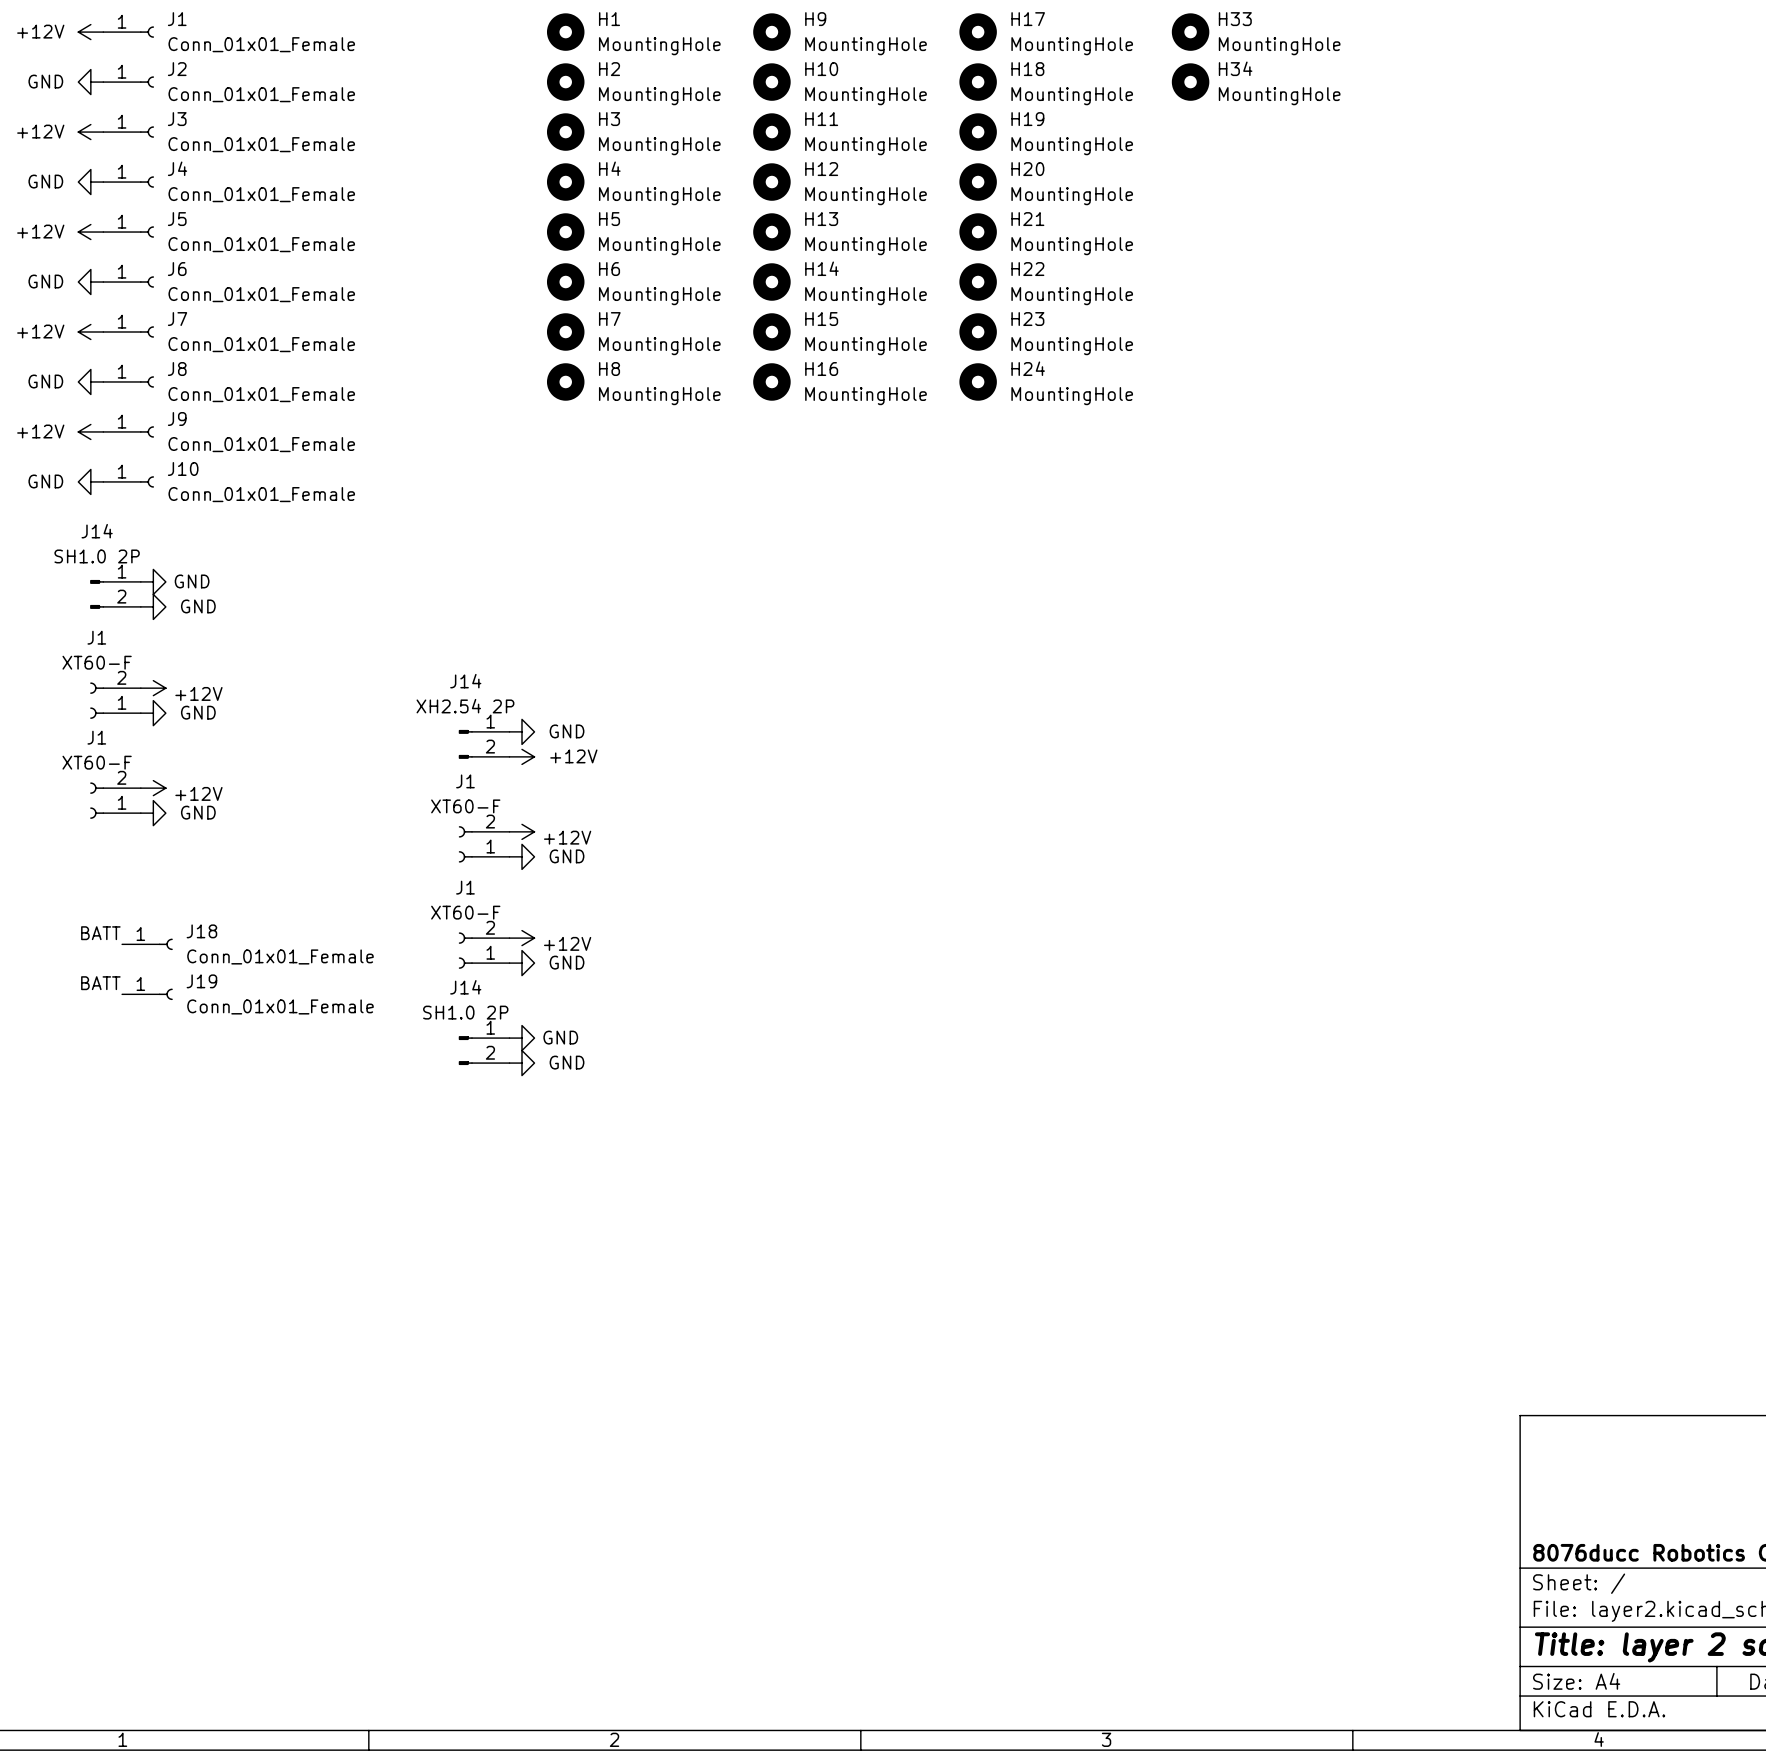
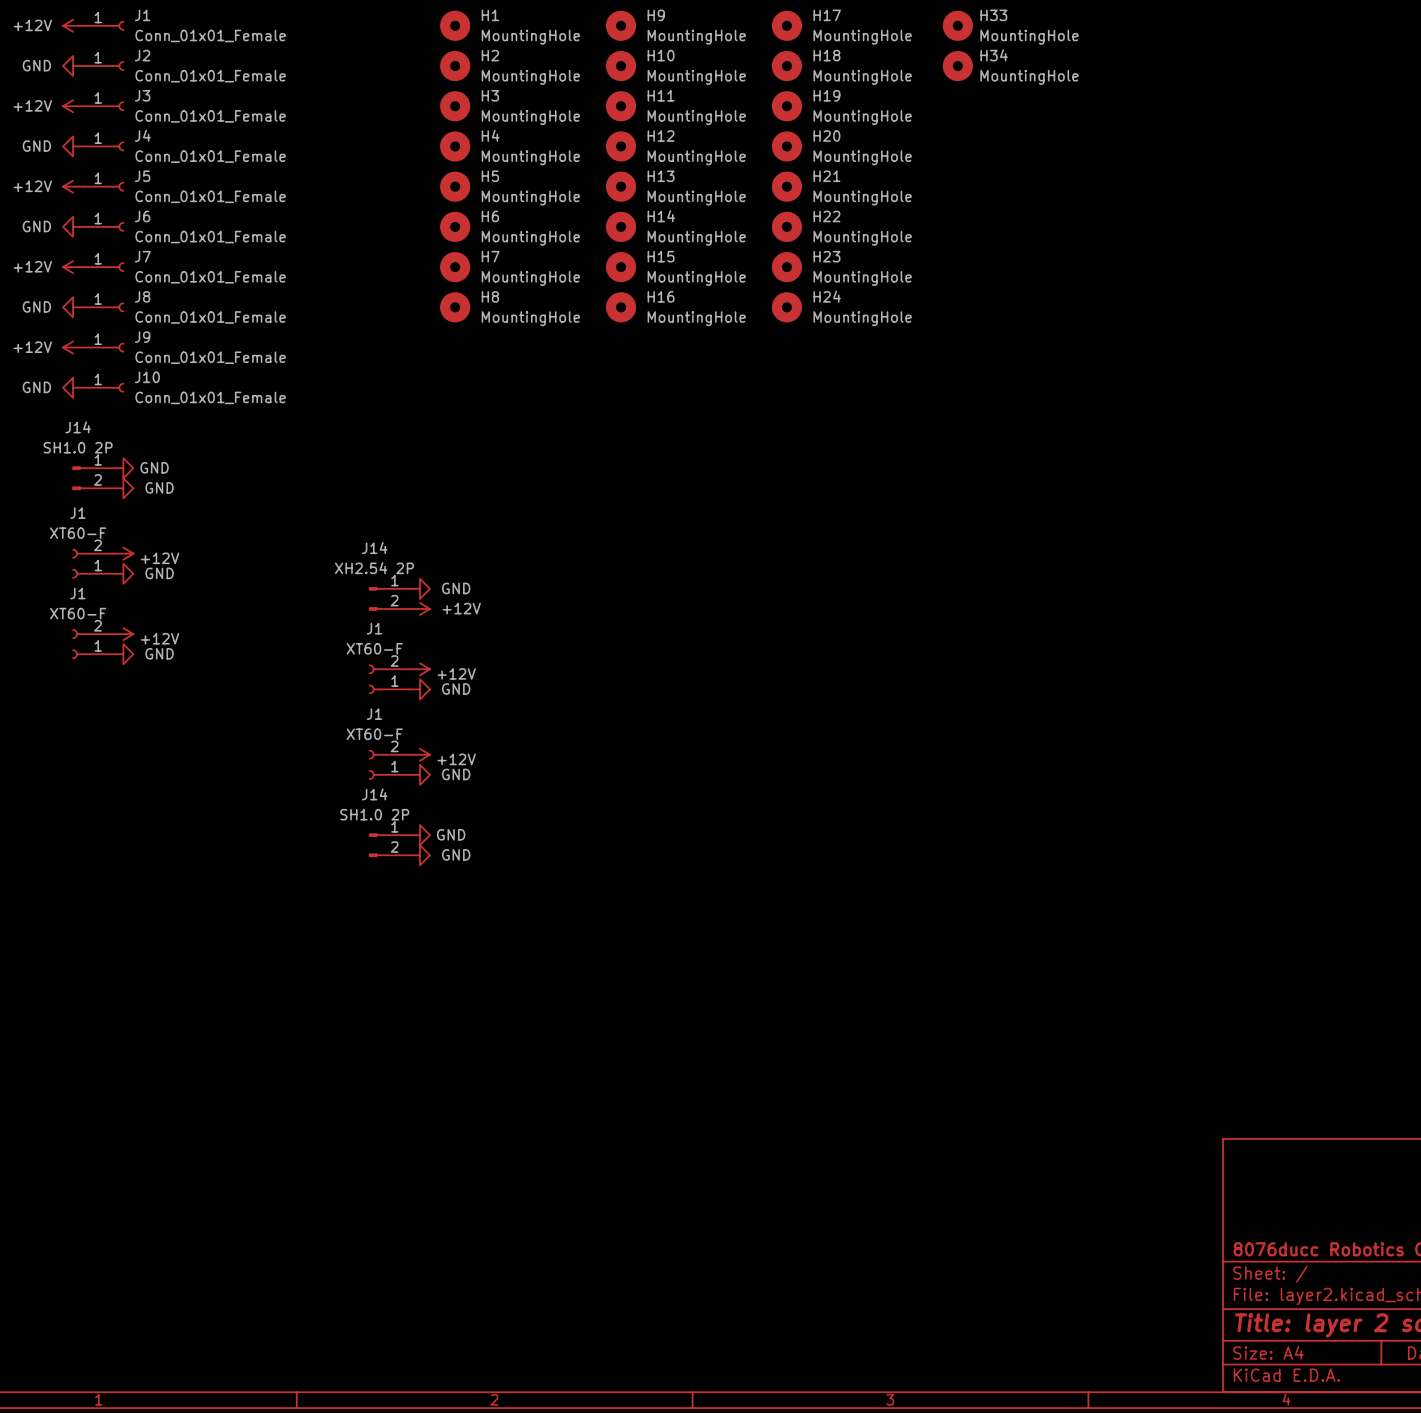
label: BATT (100, 933) -> none
J18: Conn_01x01_Female (147, 944) -> none
label: BATT (100, 983) -> none
J19: Conn_01x01_Female (147, 994) -> none

